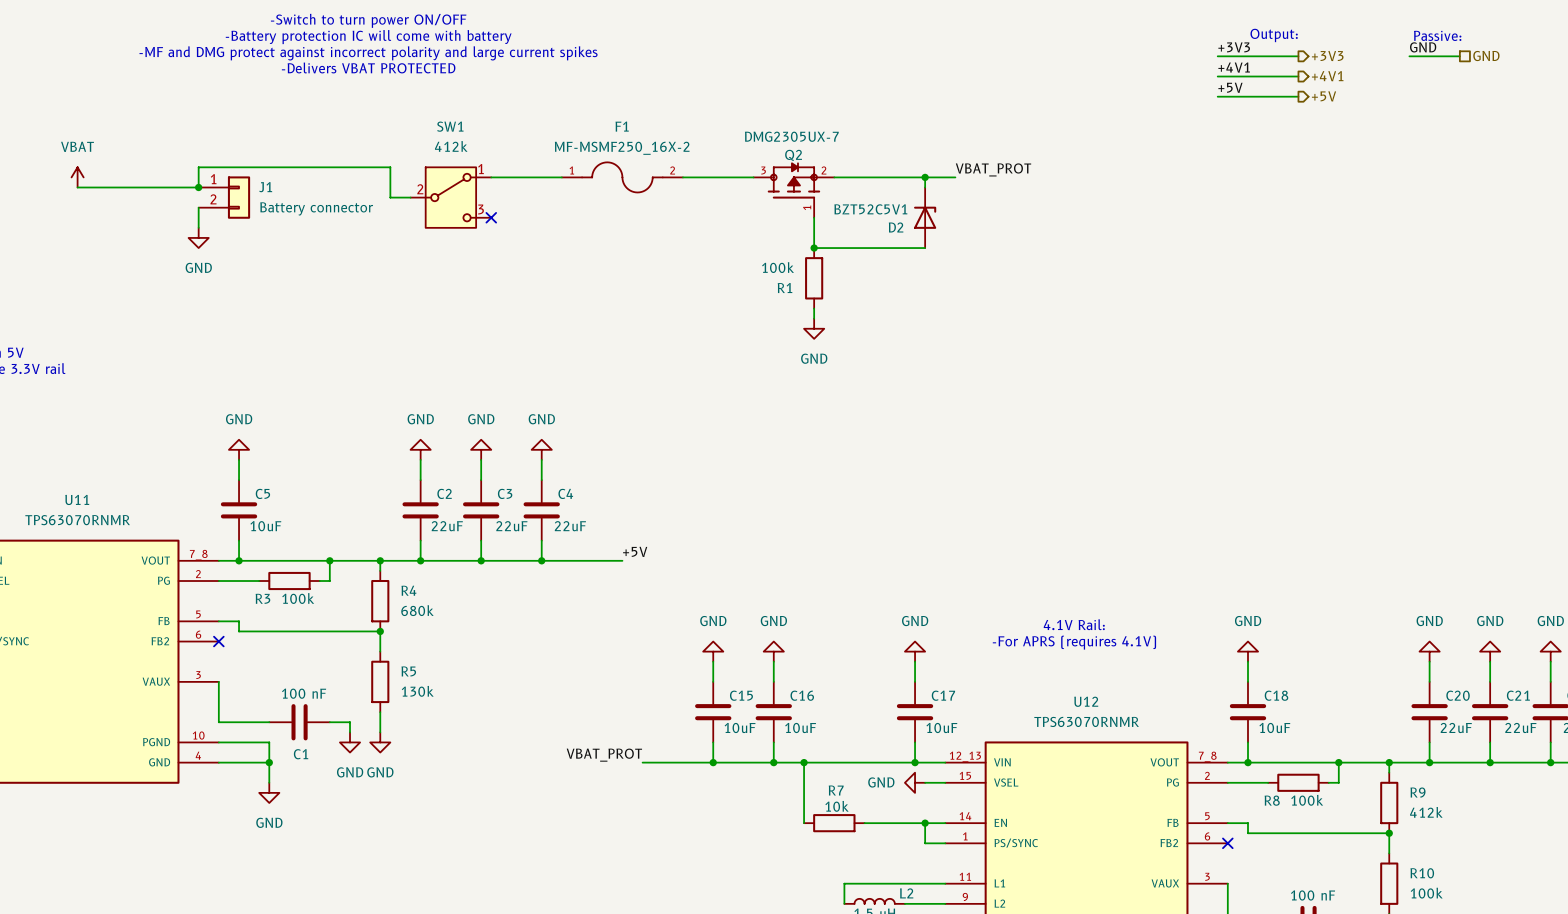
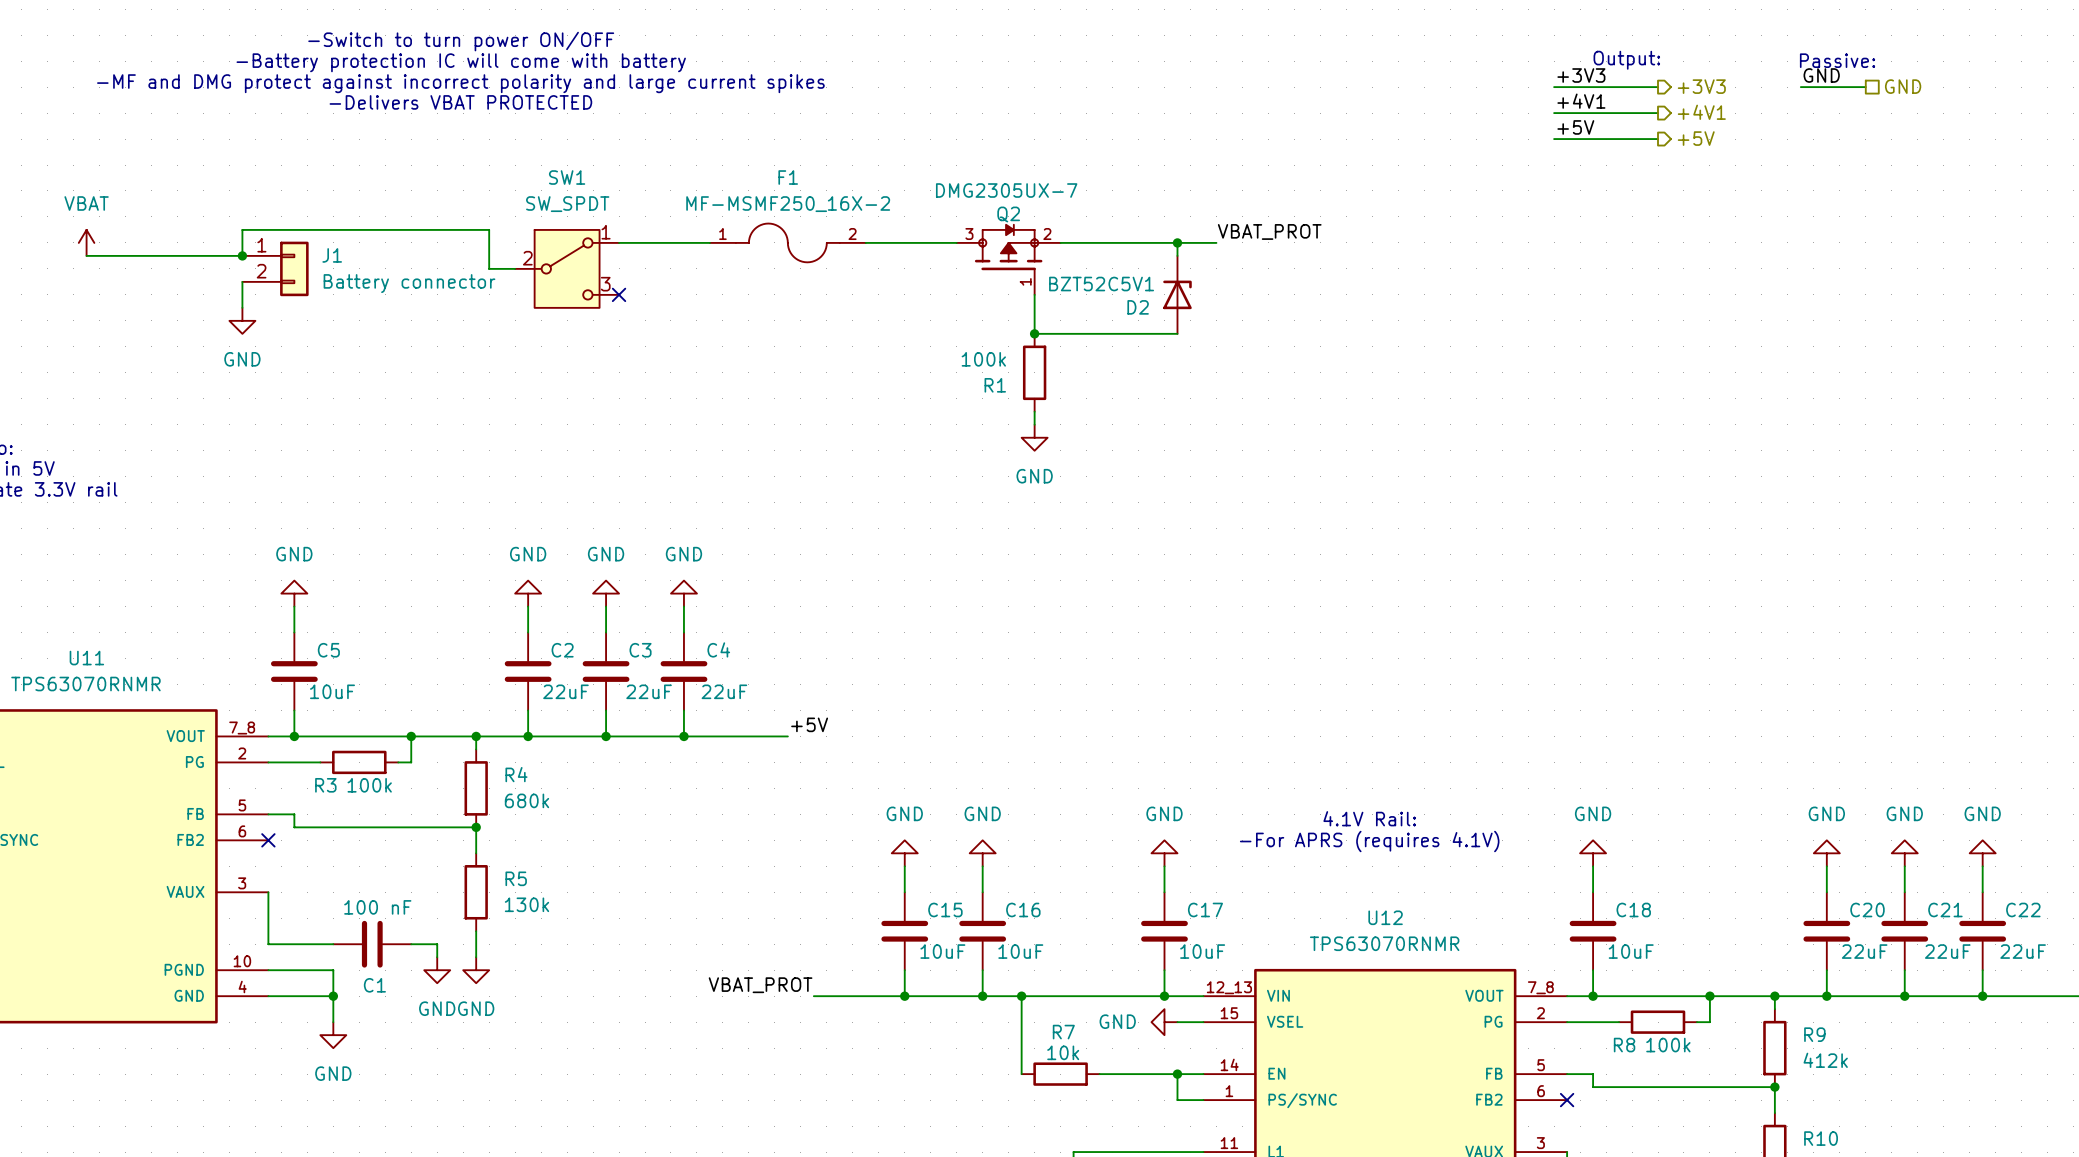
SW1 value: 412k (451, 146) -> SW_SPDT (567, 204)

